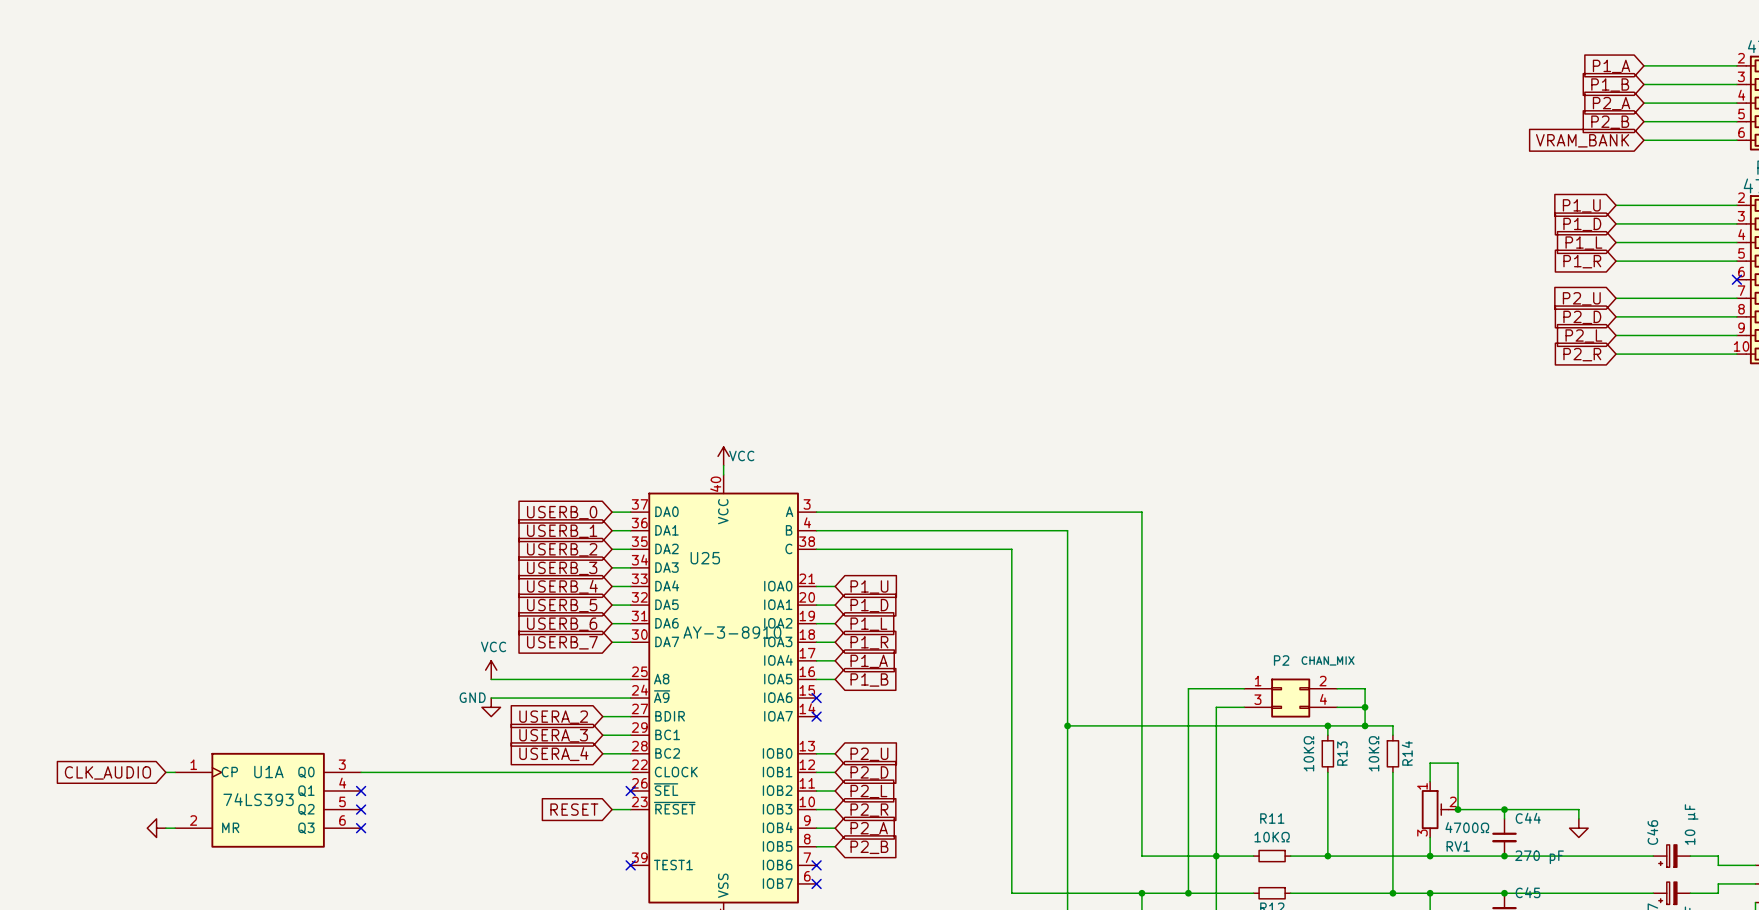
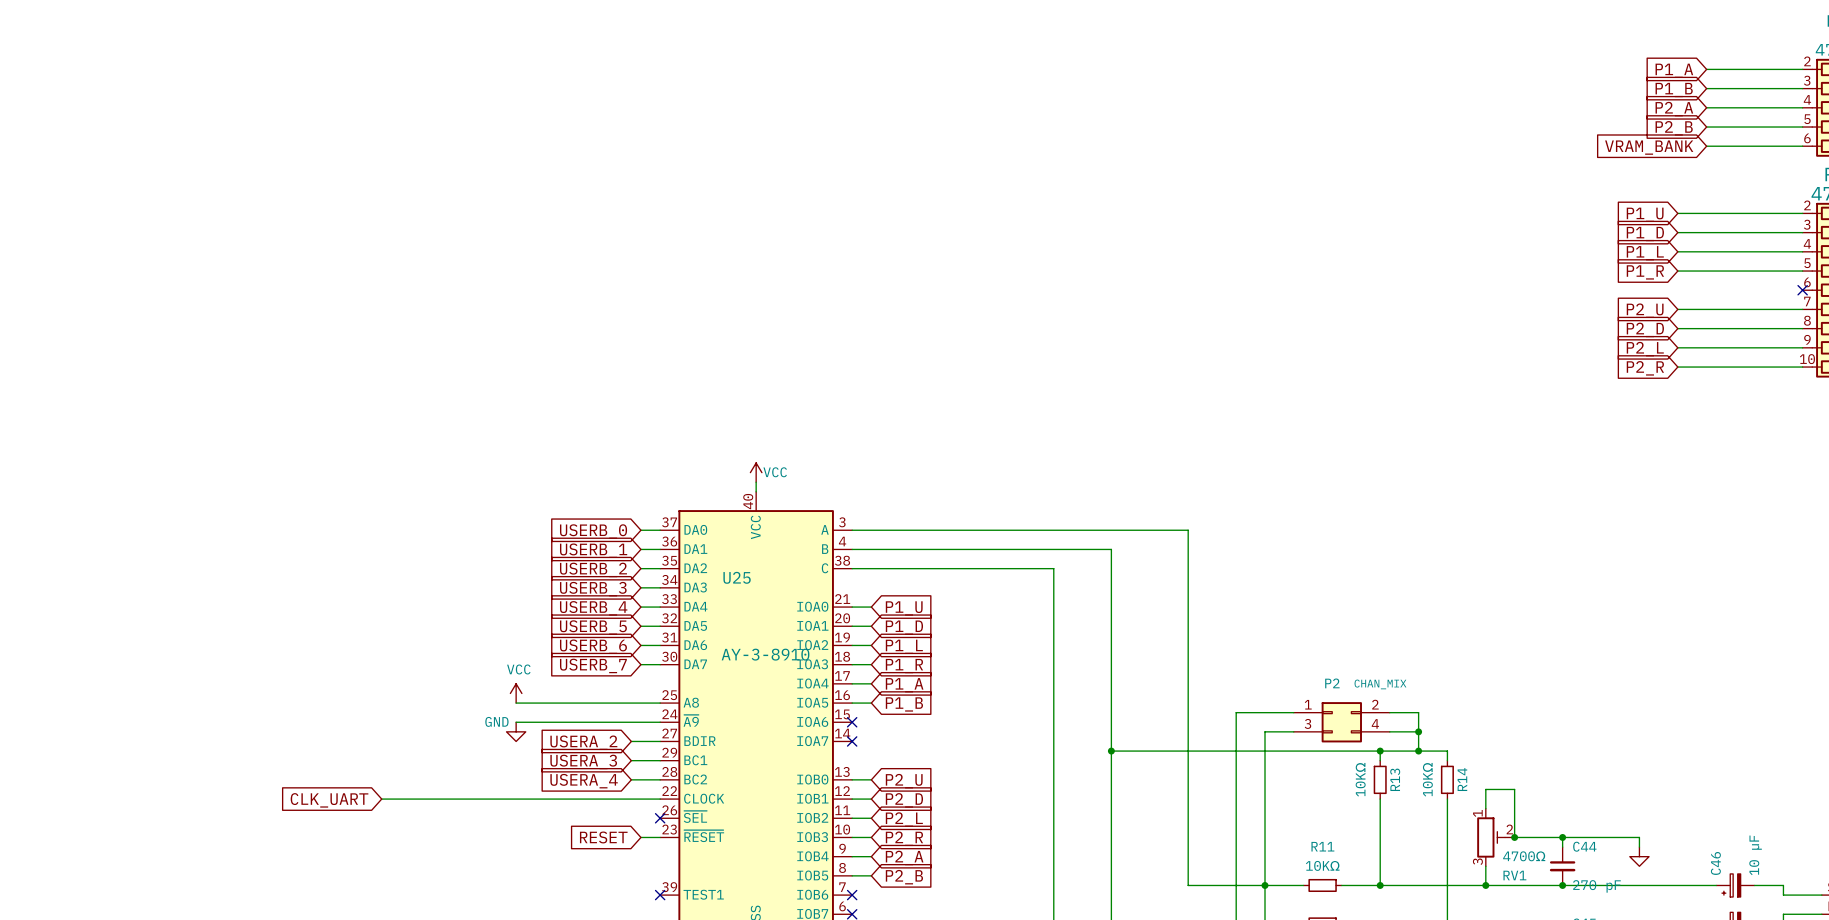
global label: CLK_AUDIO (107, 772) -> none
wire: (165, 772) (175, 772) -> none
global label: none -> CLK_UART (329, 800)
no-connect mark: (361, 790) -> none
U1A: 74LS393 (268, 800) -> none
no-connect mark: (361, 809) -> none
power symbol: (156, 828) -> none
wire: (165, 828) (175, 828) -> none
no-connect mark: (361, 828) -> none

